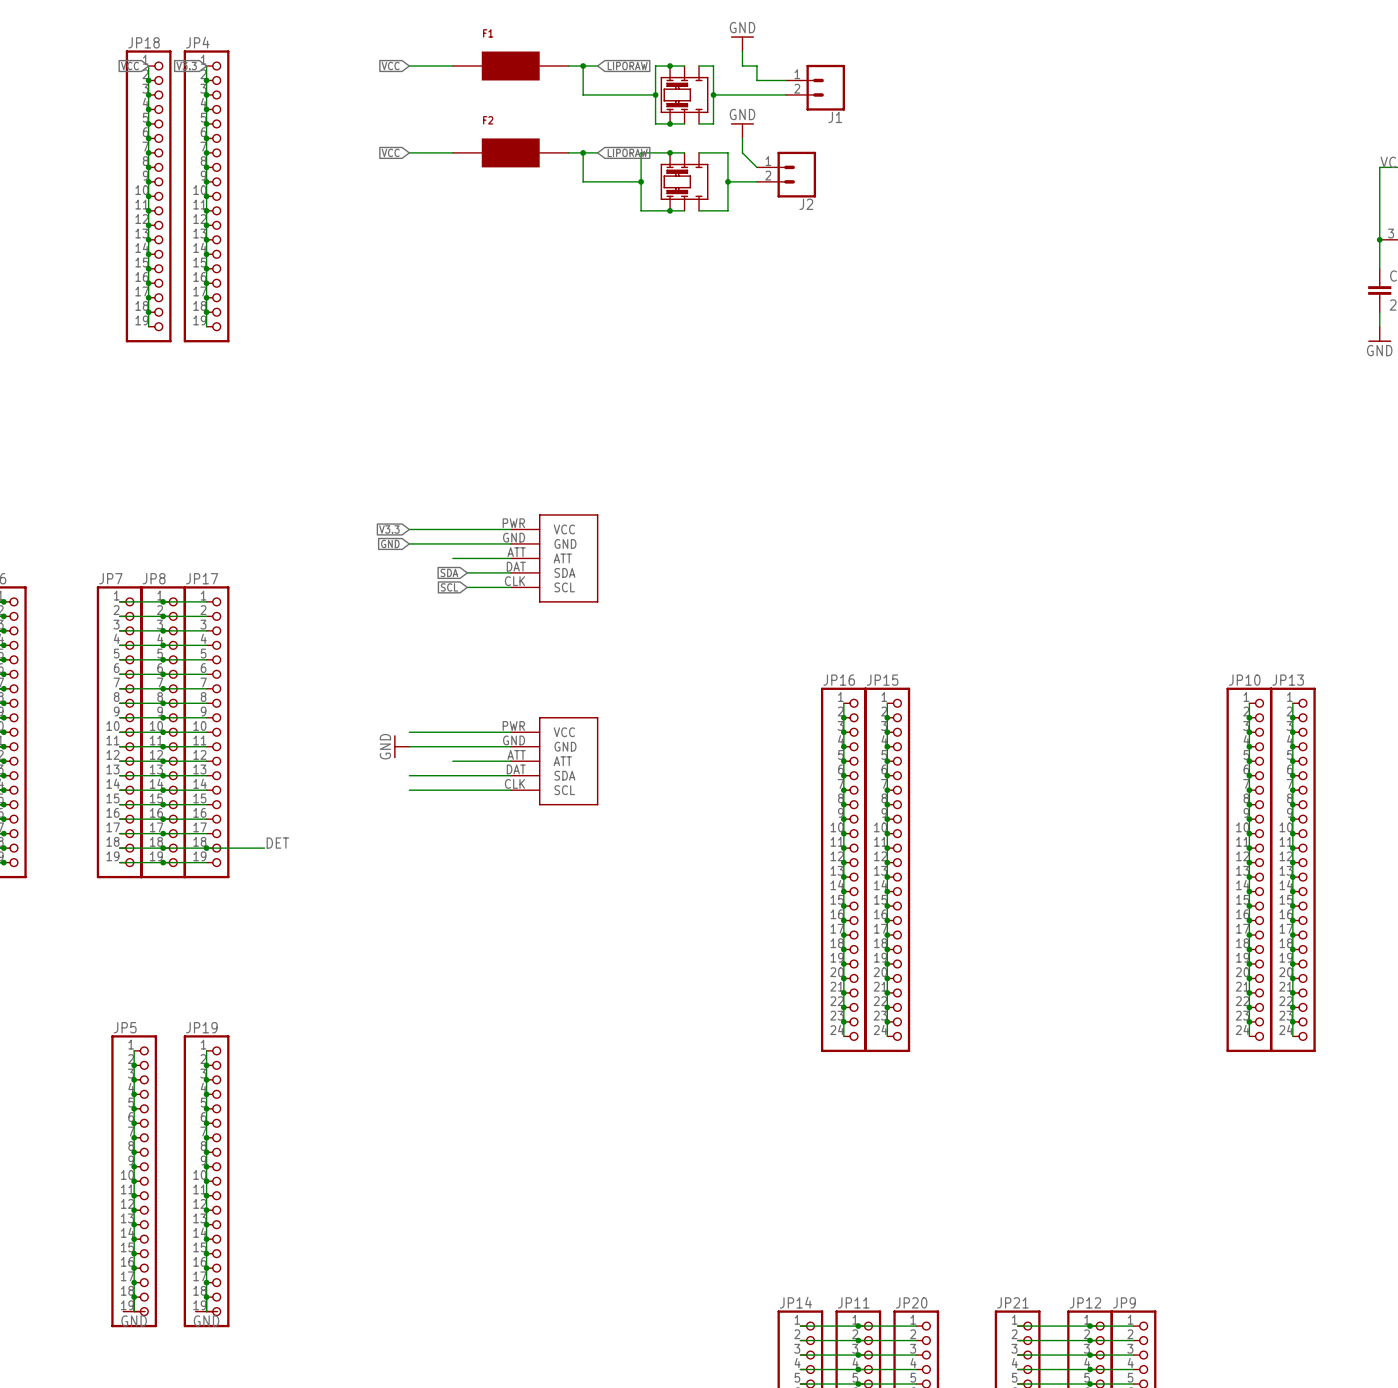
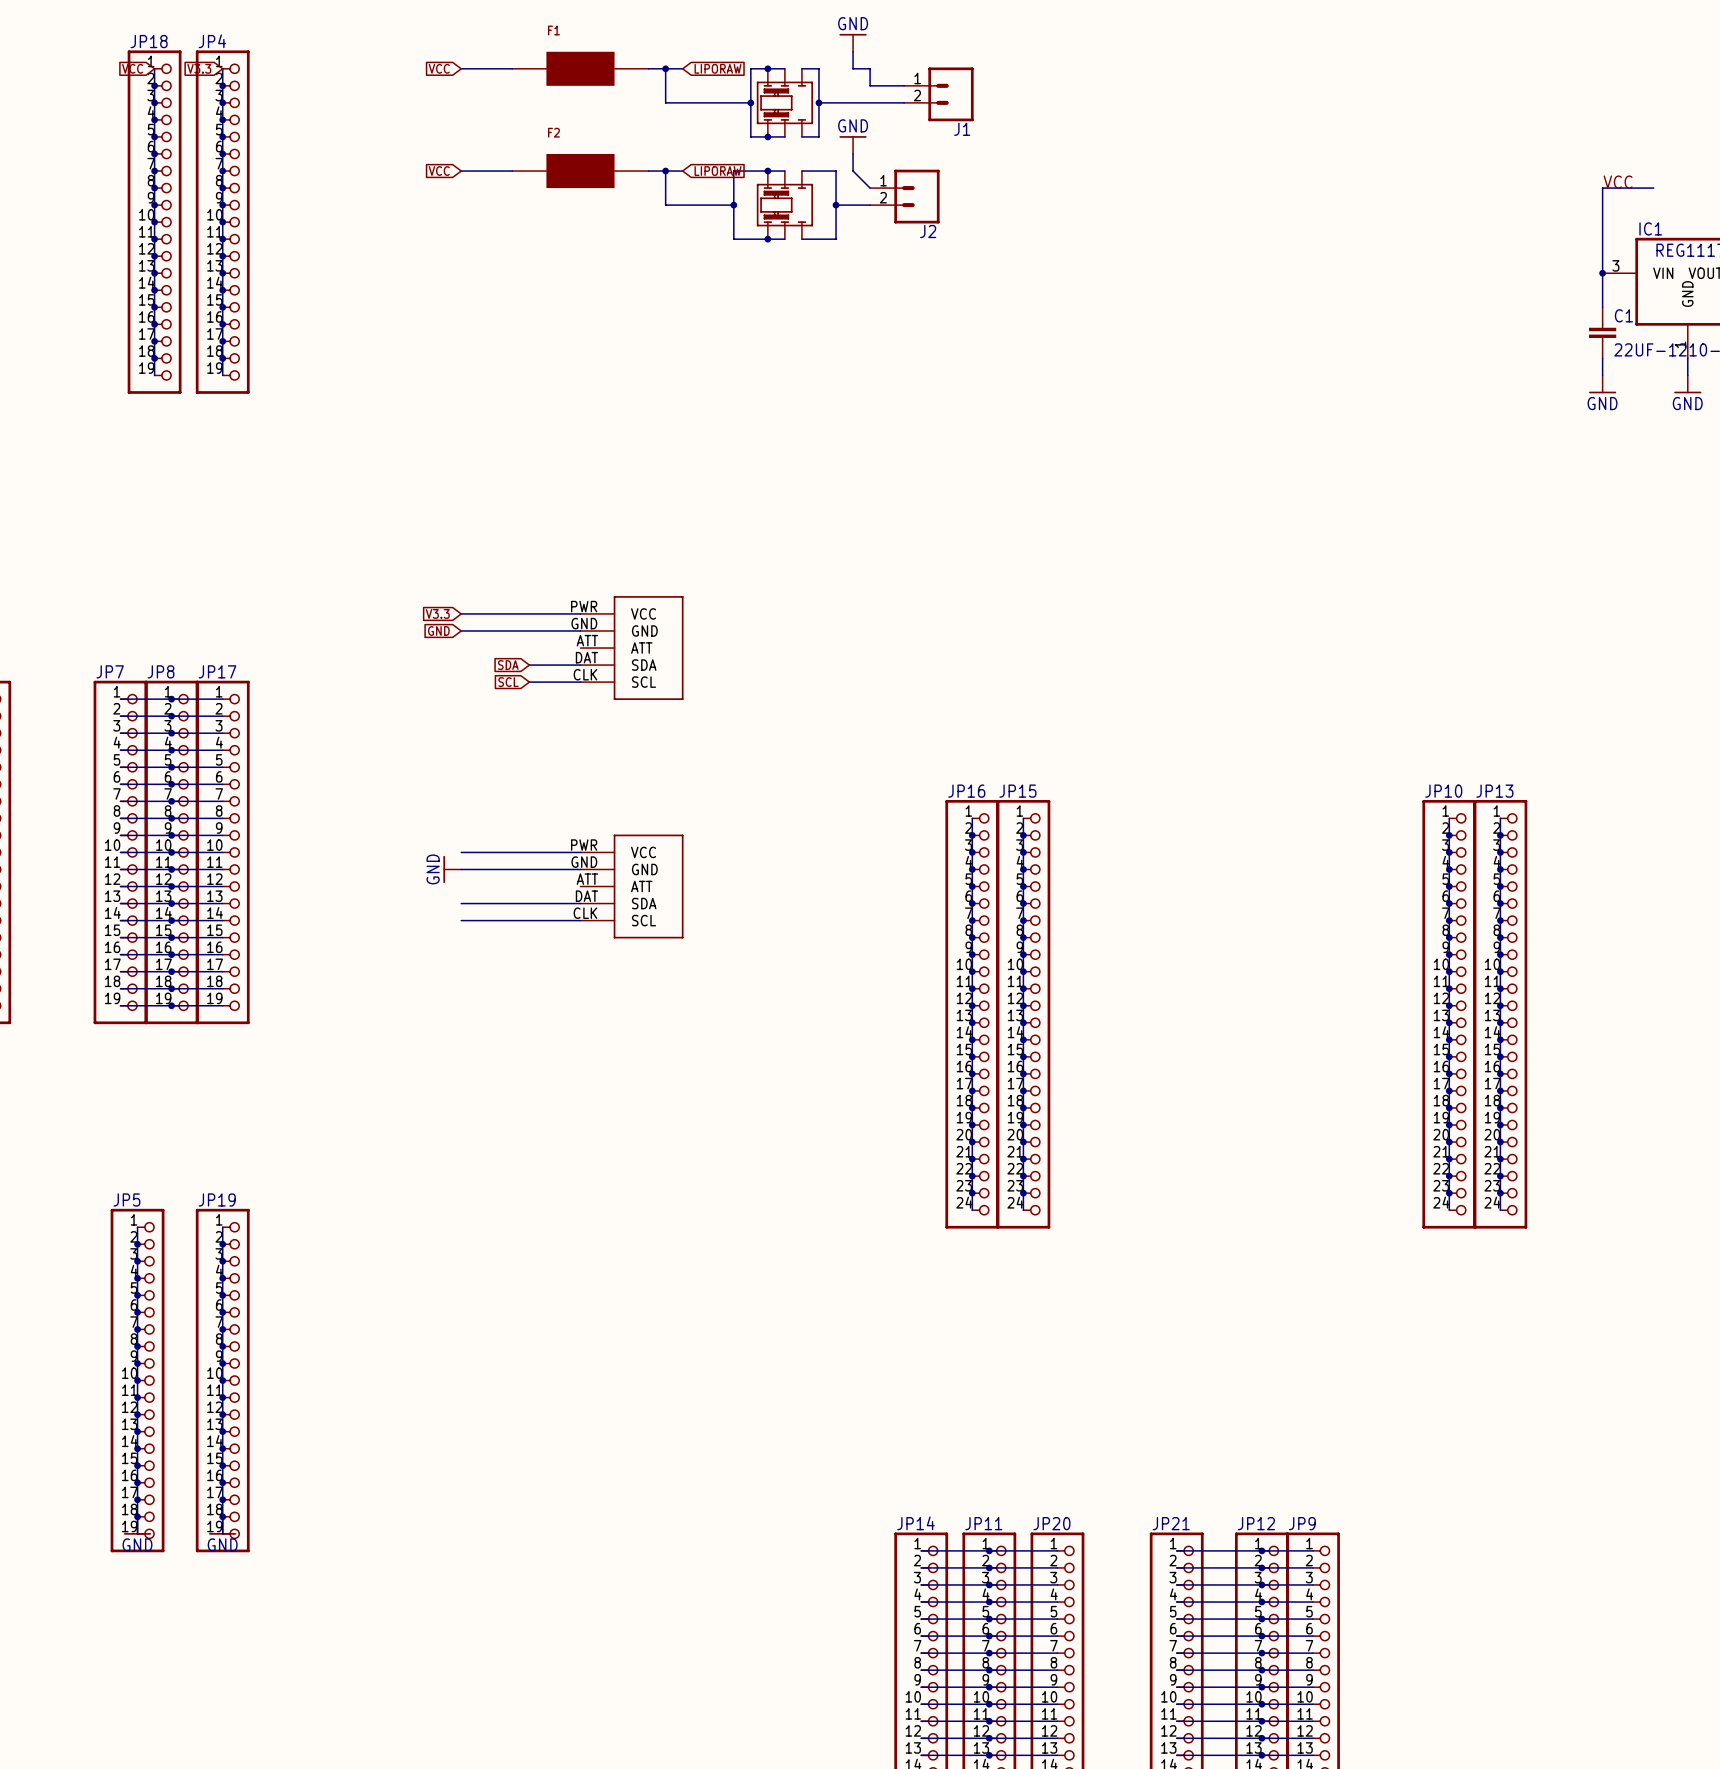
wire: (452, 558) (510, 558) -> none
wire: (452, 761) (510, 761) -> none
label: DET (277, 843) -> none
wire: (206, 848) (264, 848) -> none
junction: (206, 848) -> none

